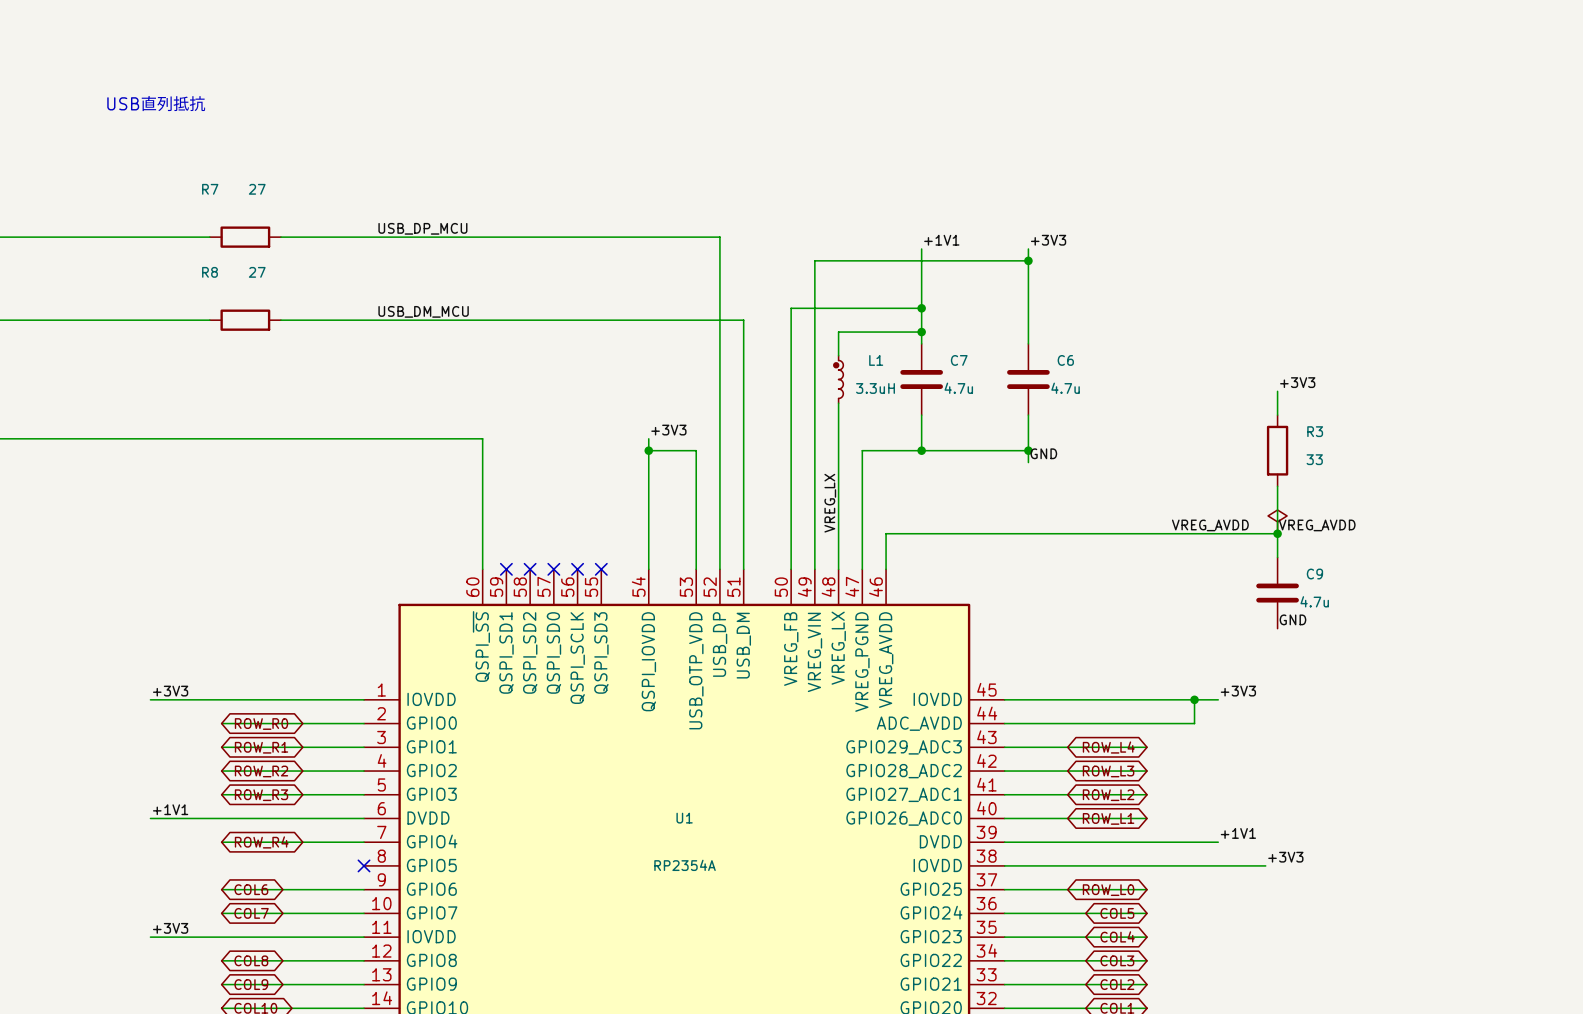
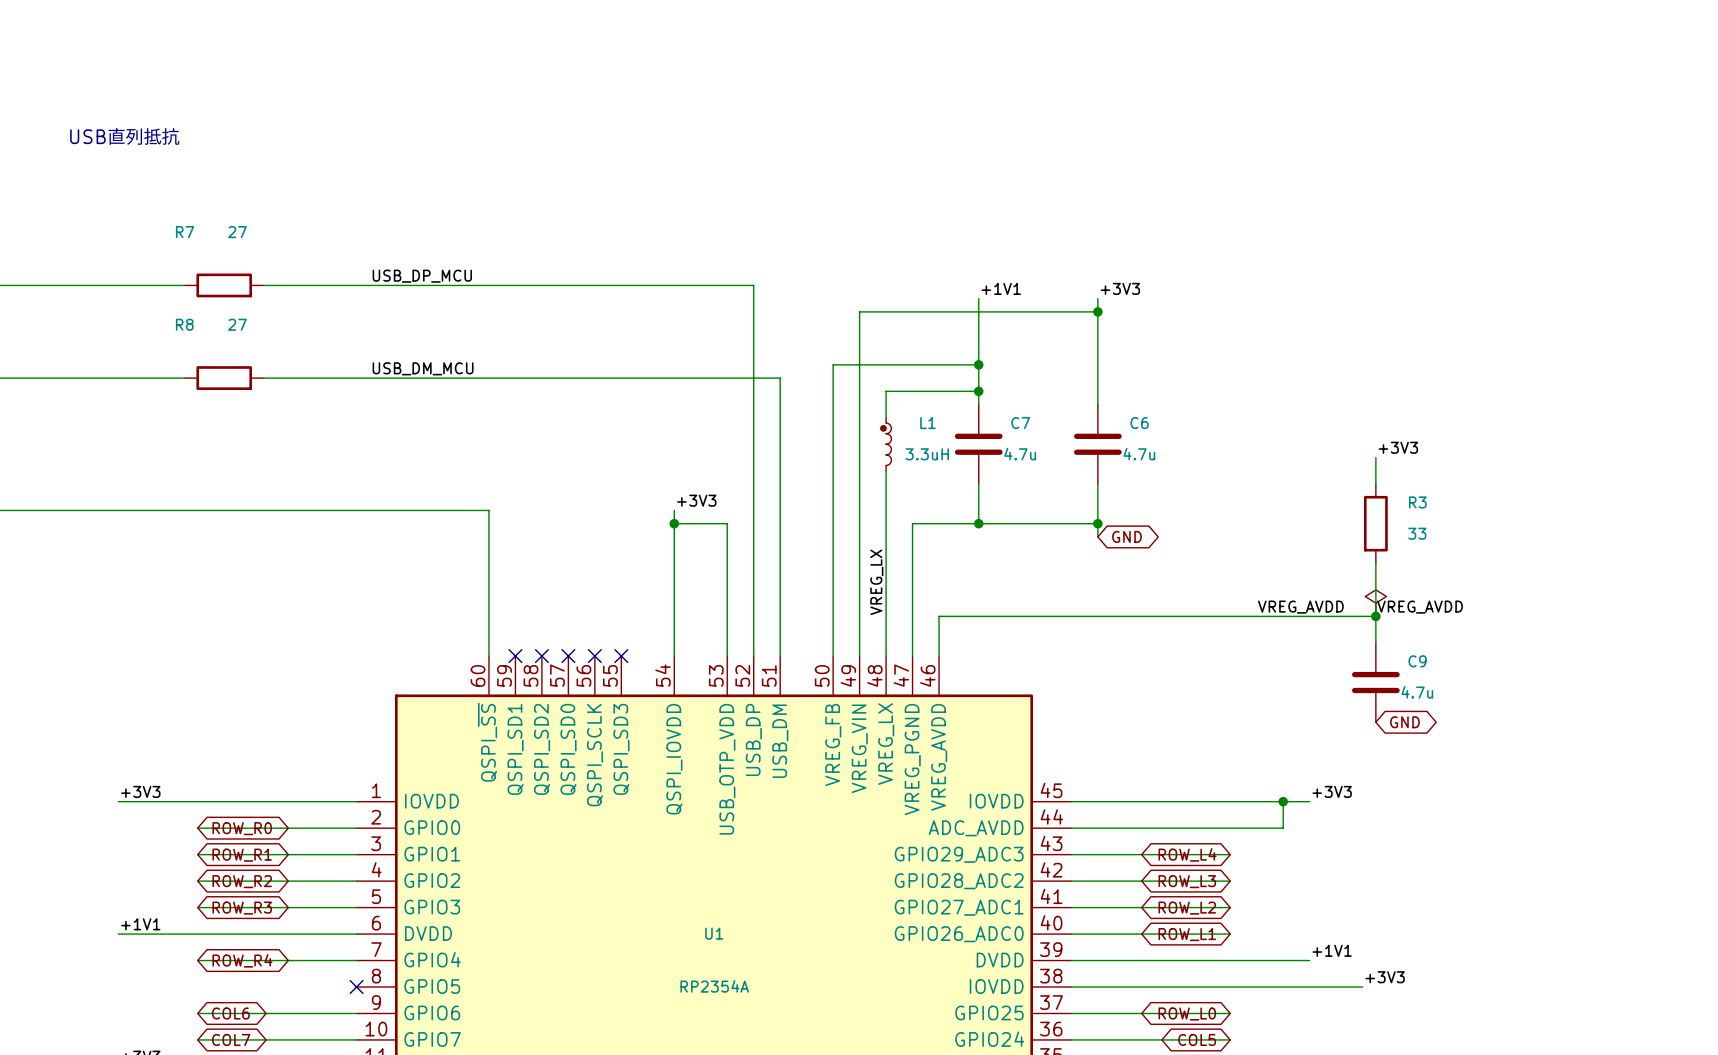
label: GND (1043, 453) -> none
global label: none -> GND (1126, 536)
label: GND (1292, 619) -> none
global label: none -> GND (1404, 722)

